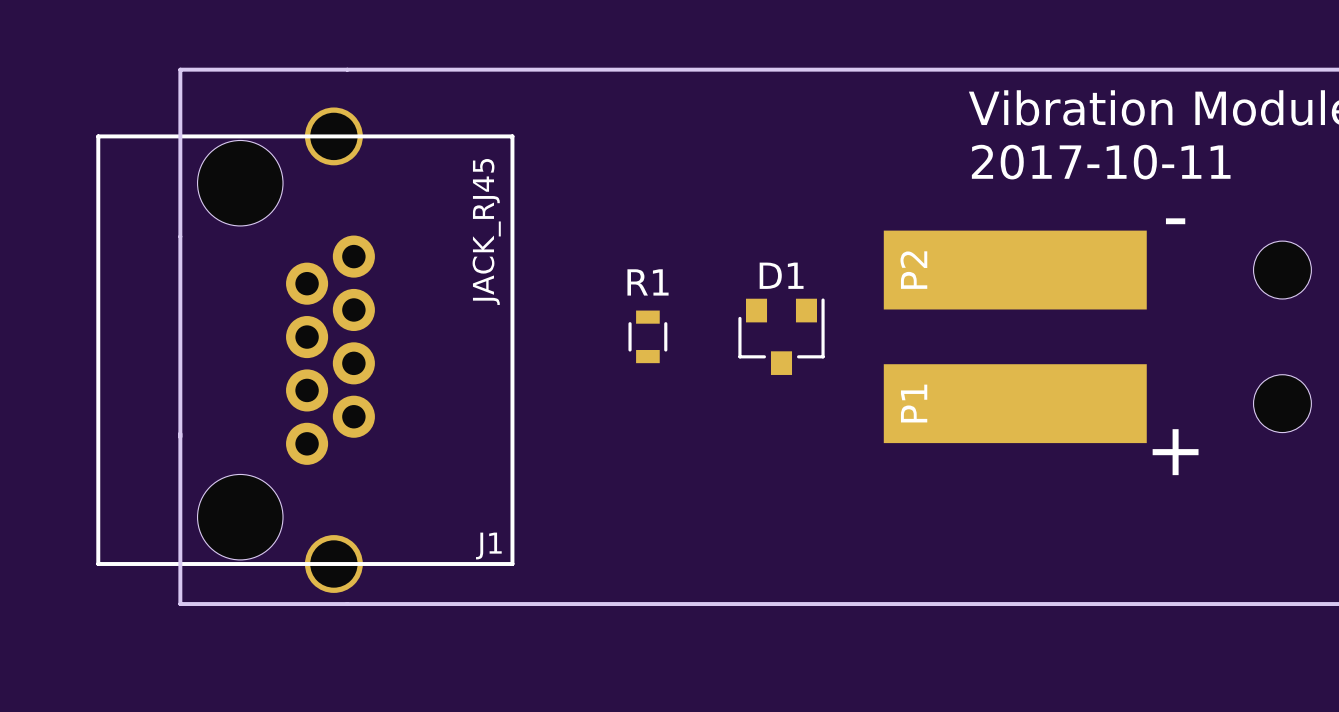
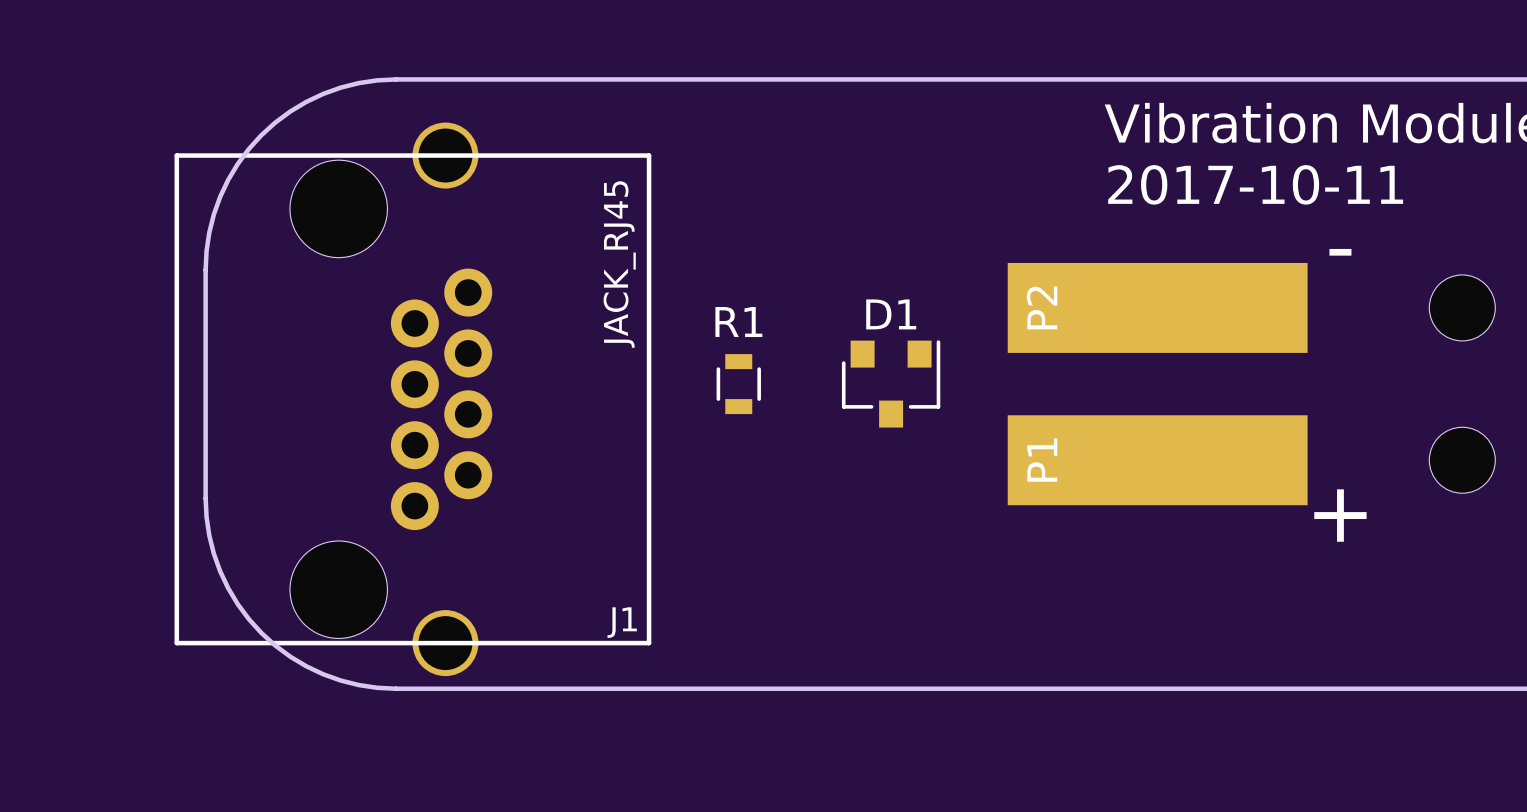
board edge: (347, 69) (180, 69) (180, 236) -> (396, 79) (358, 83) (323, 93) (290, 111) (261, 135) (237, 164) (220, 196) (209, 232) (205, 269)
J1 position: (305, 350) -> (412, 399)
board edge: (180, 437) (180, 604) (347, 604) -> (205, 498) (209, 535) (220, 571) (237, 604) (261, 632) (290, 656) (323, 674) (358, 685) (396, 688)

